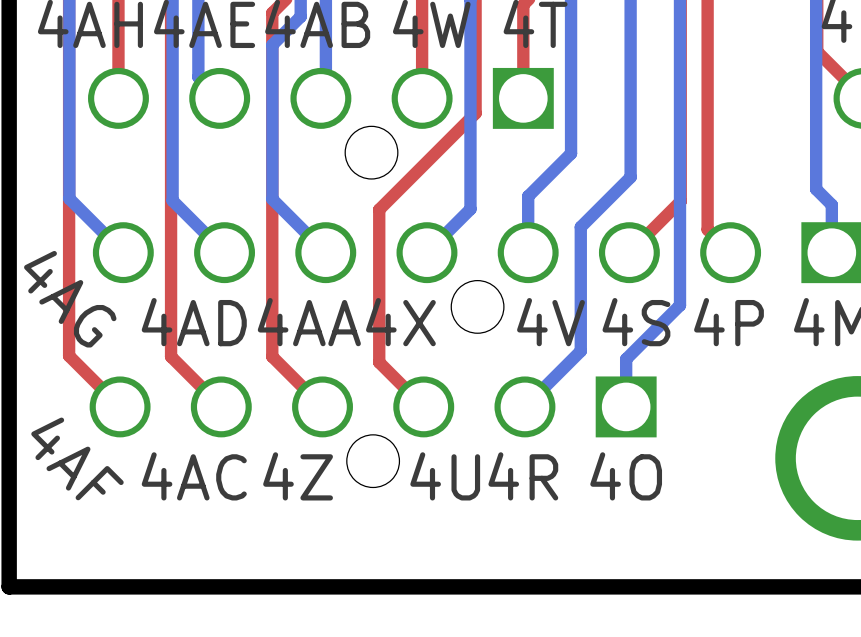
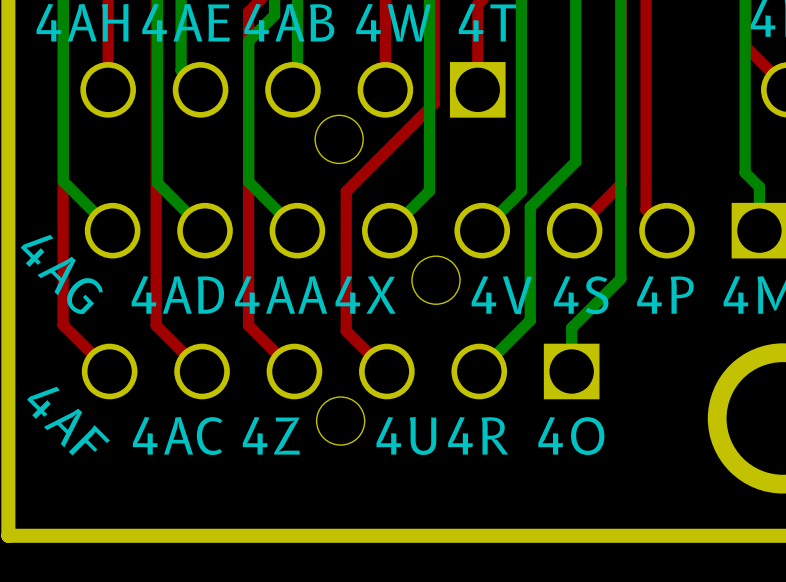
bottom track: (571, 153) (528, 196) (528, 252) -> (521, 140) (521, 191) (482, 230)

